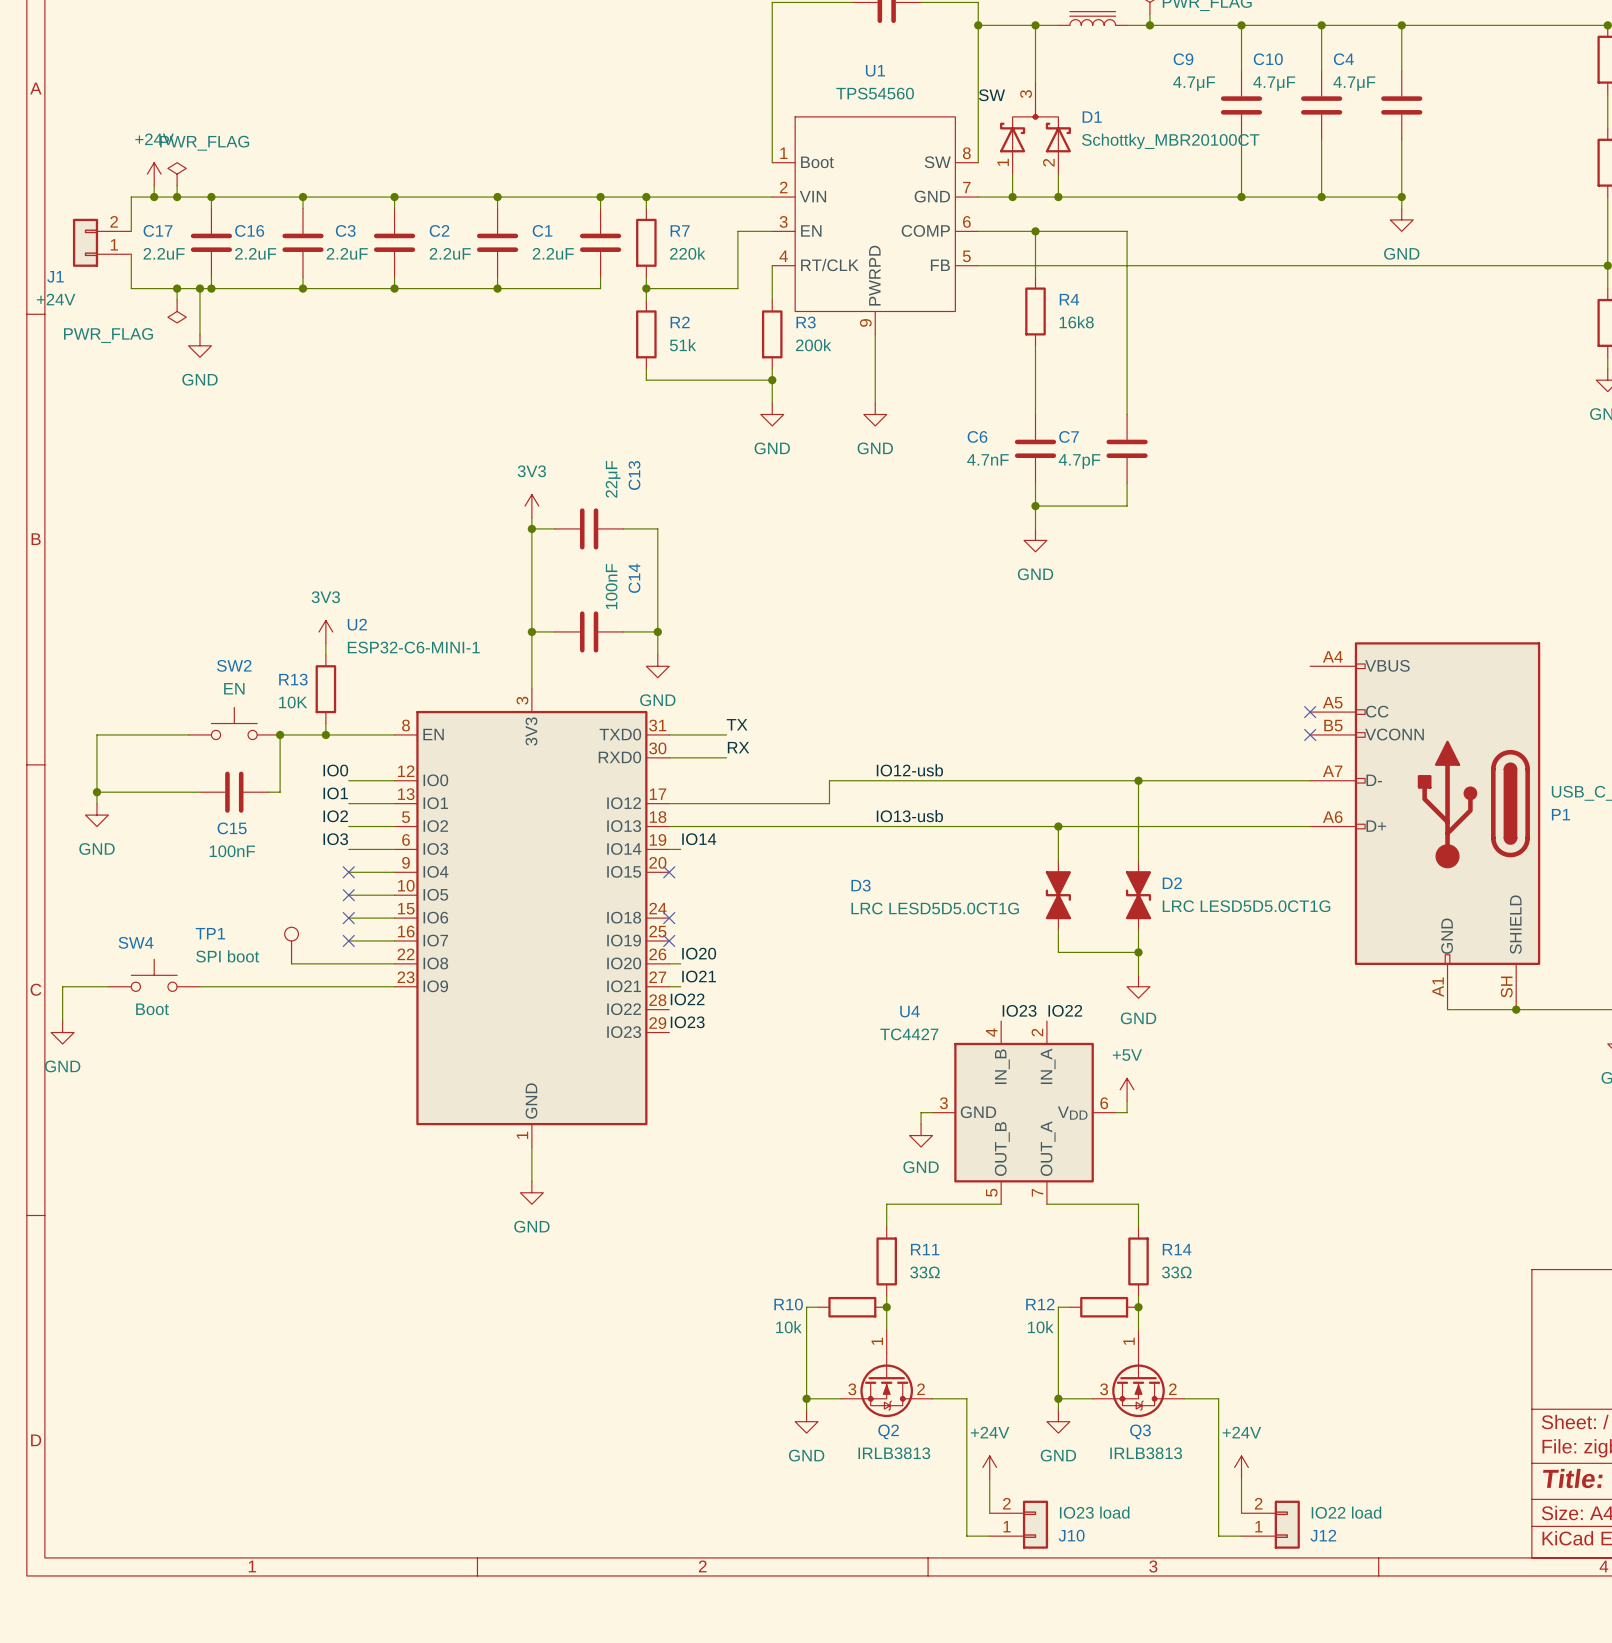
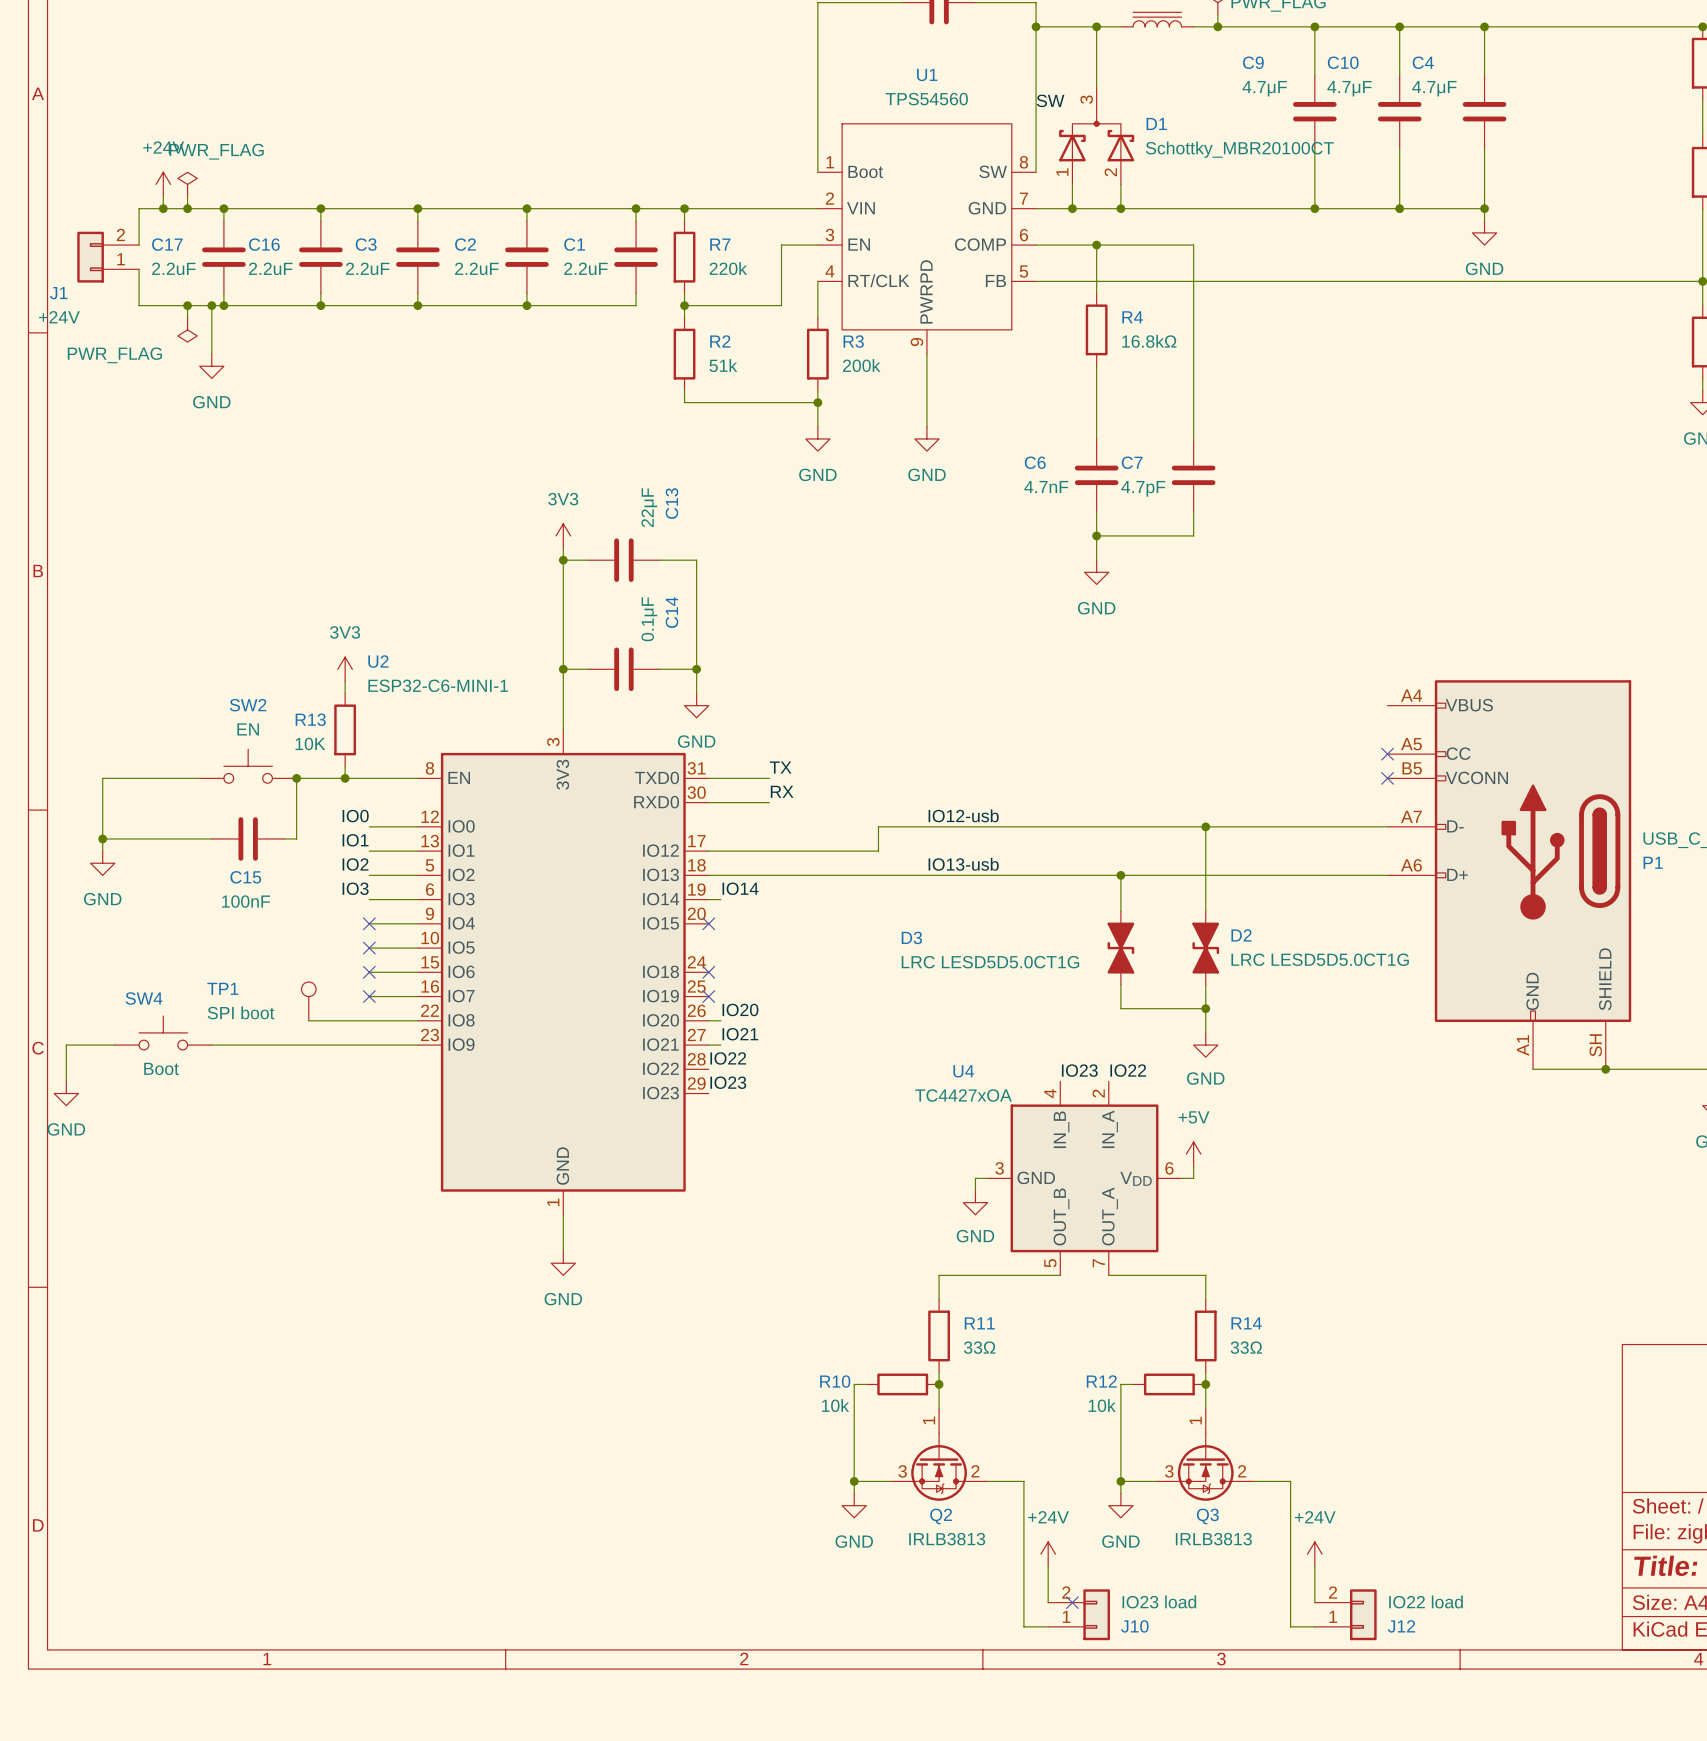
R4 value: 16k8 (1076, 322) -> 16.8kΩ (1149, 341)
C14 value: 100nF (611, 586) -> 0.1μF (649, 619)
U4 value: TC4427 (909, 1034) -> TC4427xOA (963, 1095)
no-connect mark: none -> (1072, 1602)

